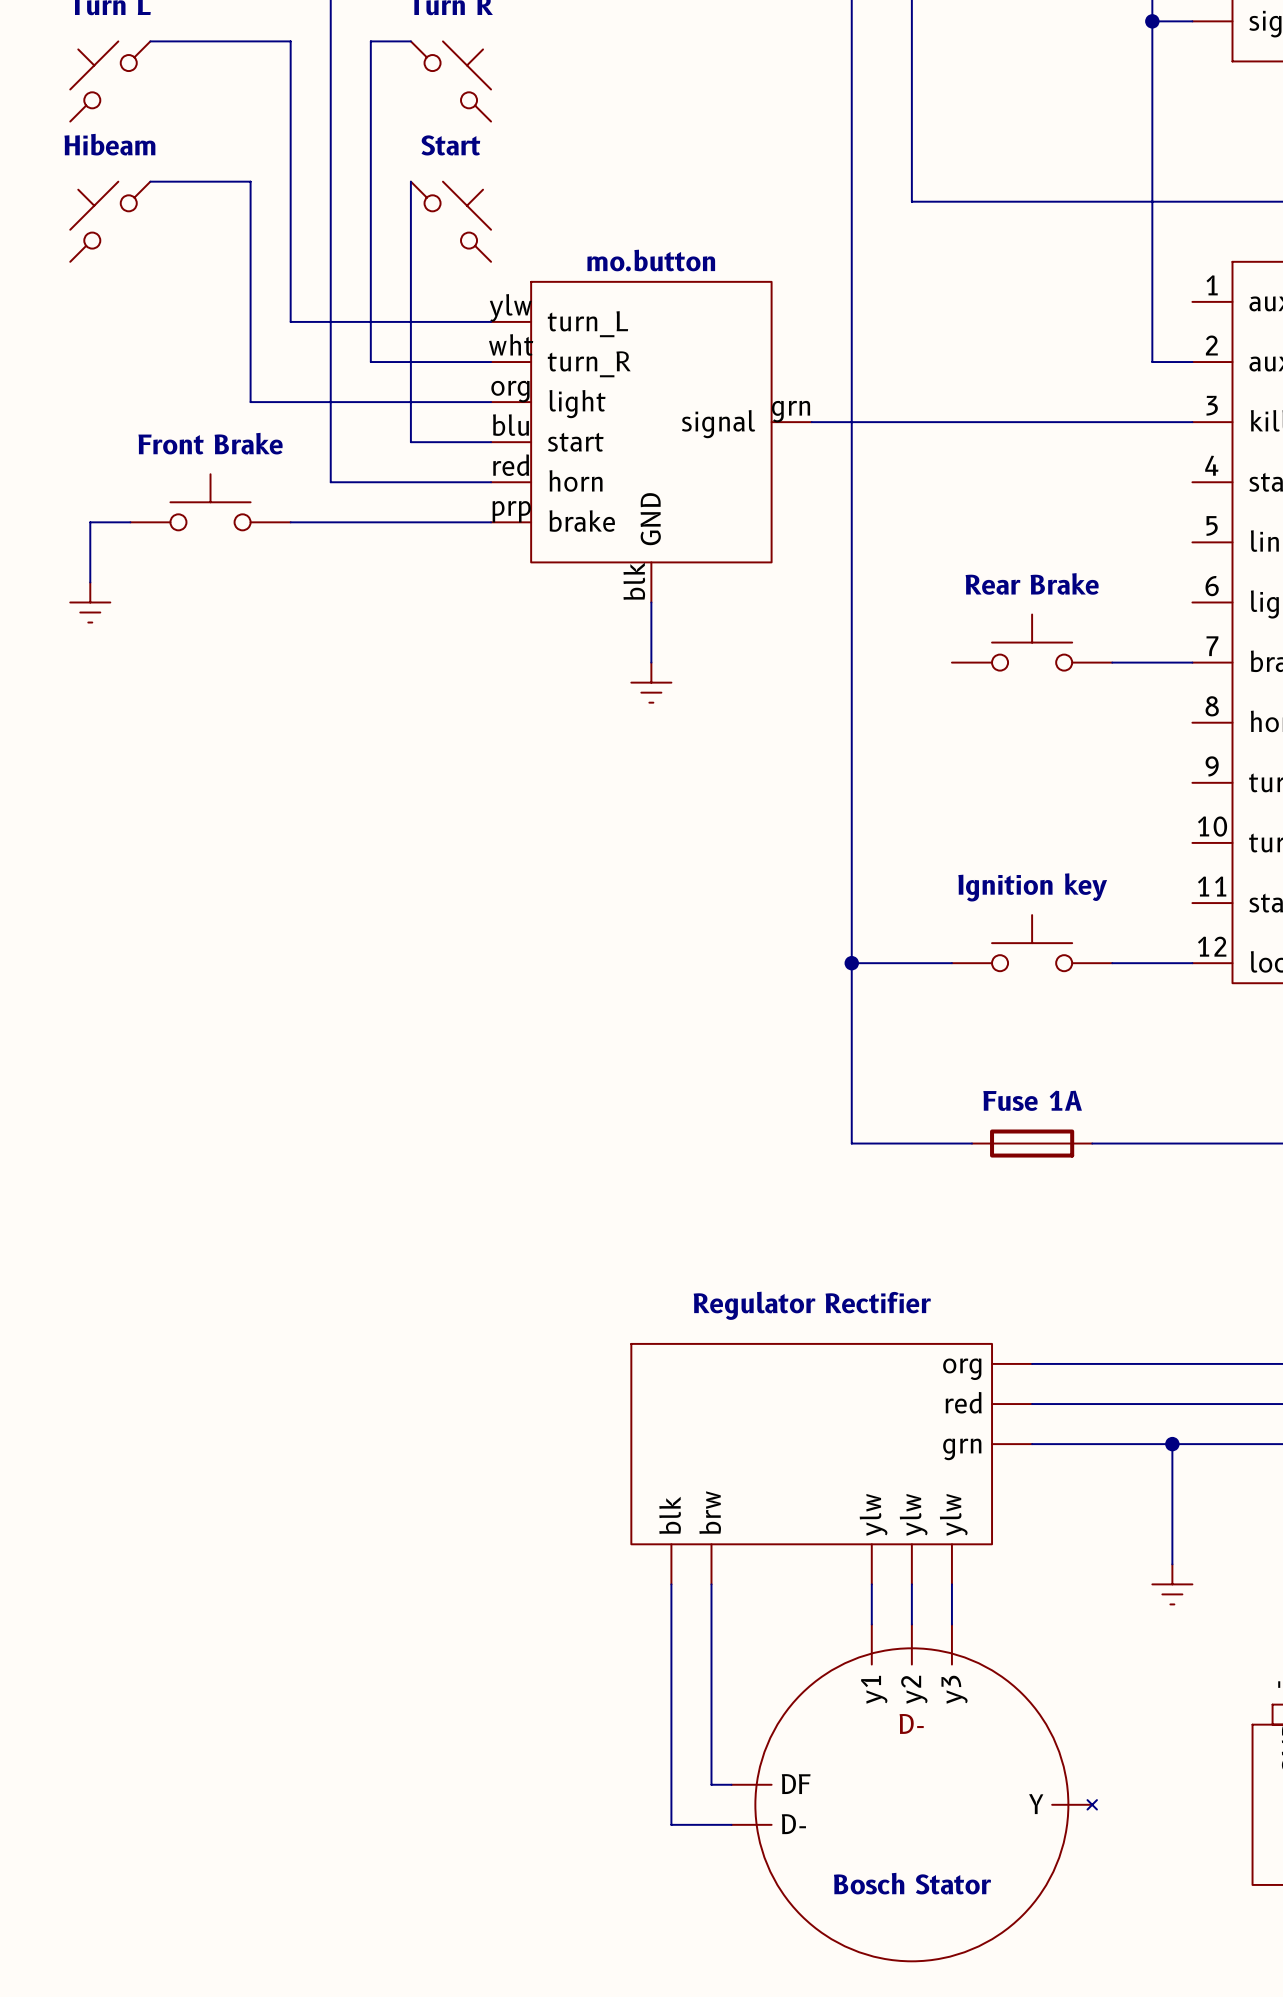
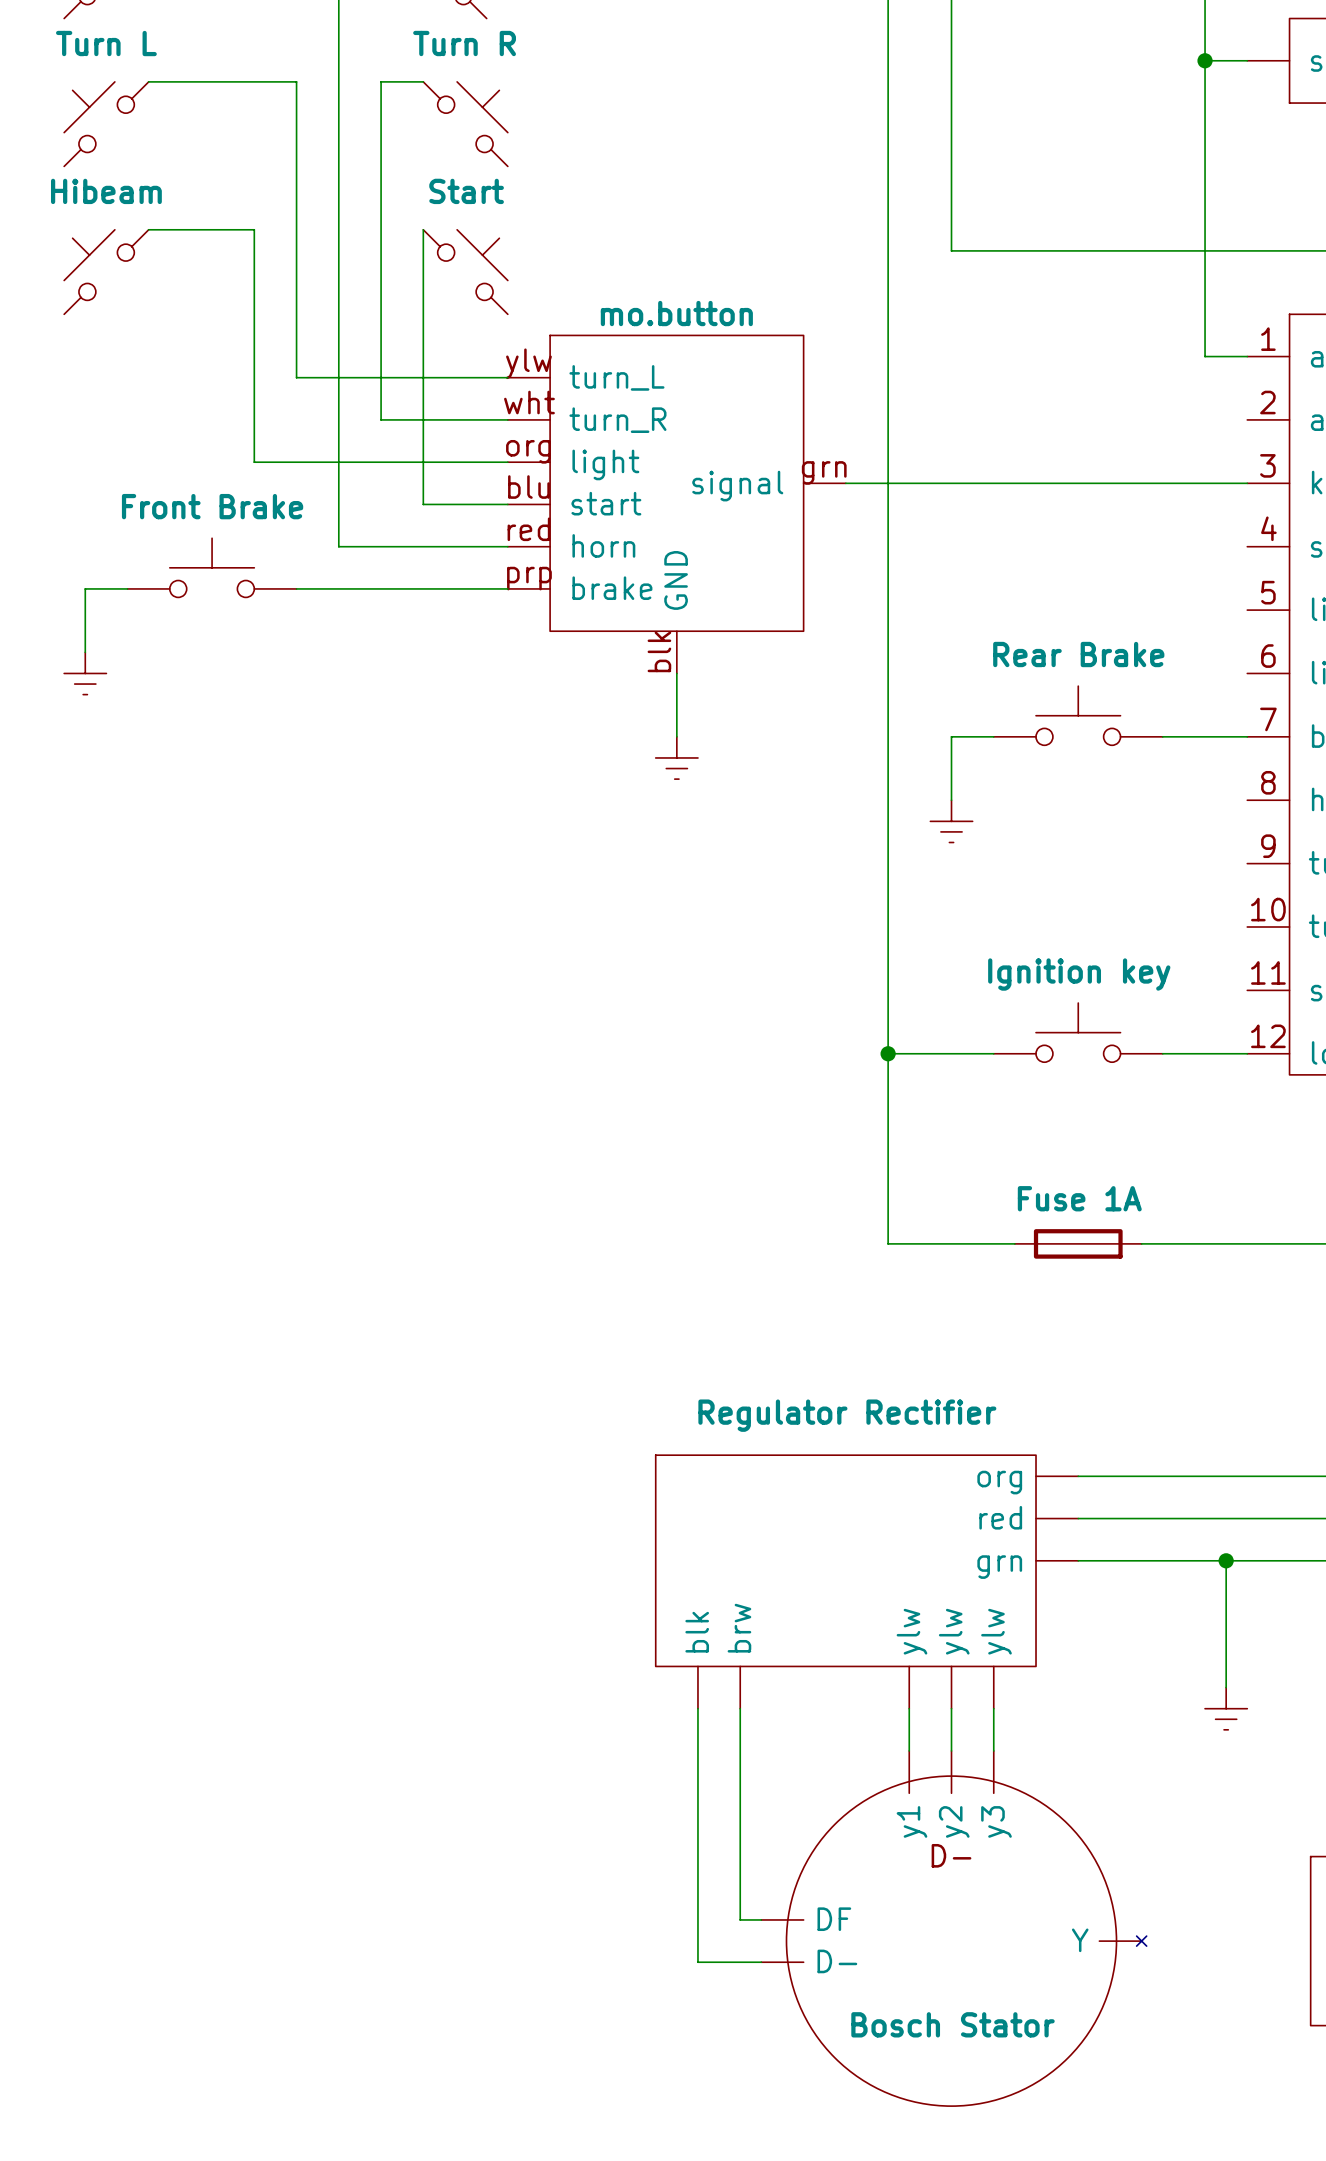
wire: (1152, 301) (1152, 362) (1192, 362) -> (1205, 356) (1247, 356)
wire: none -> (993, 736) (951, 736) (951, 800)
power symbol: none -> (951, 821)

